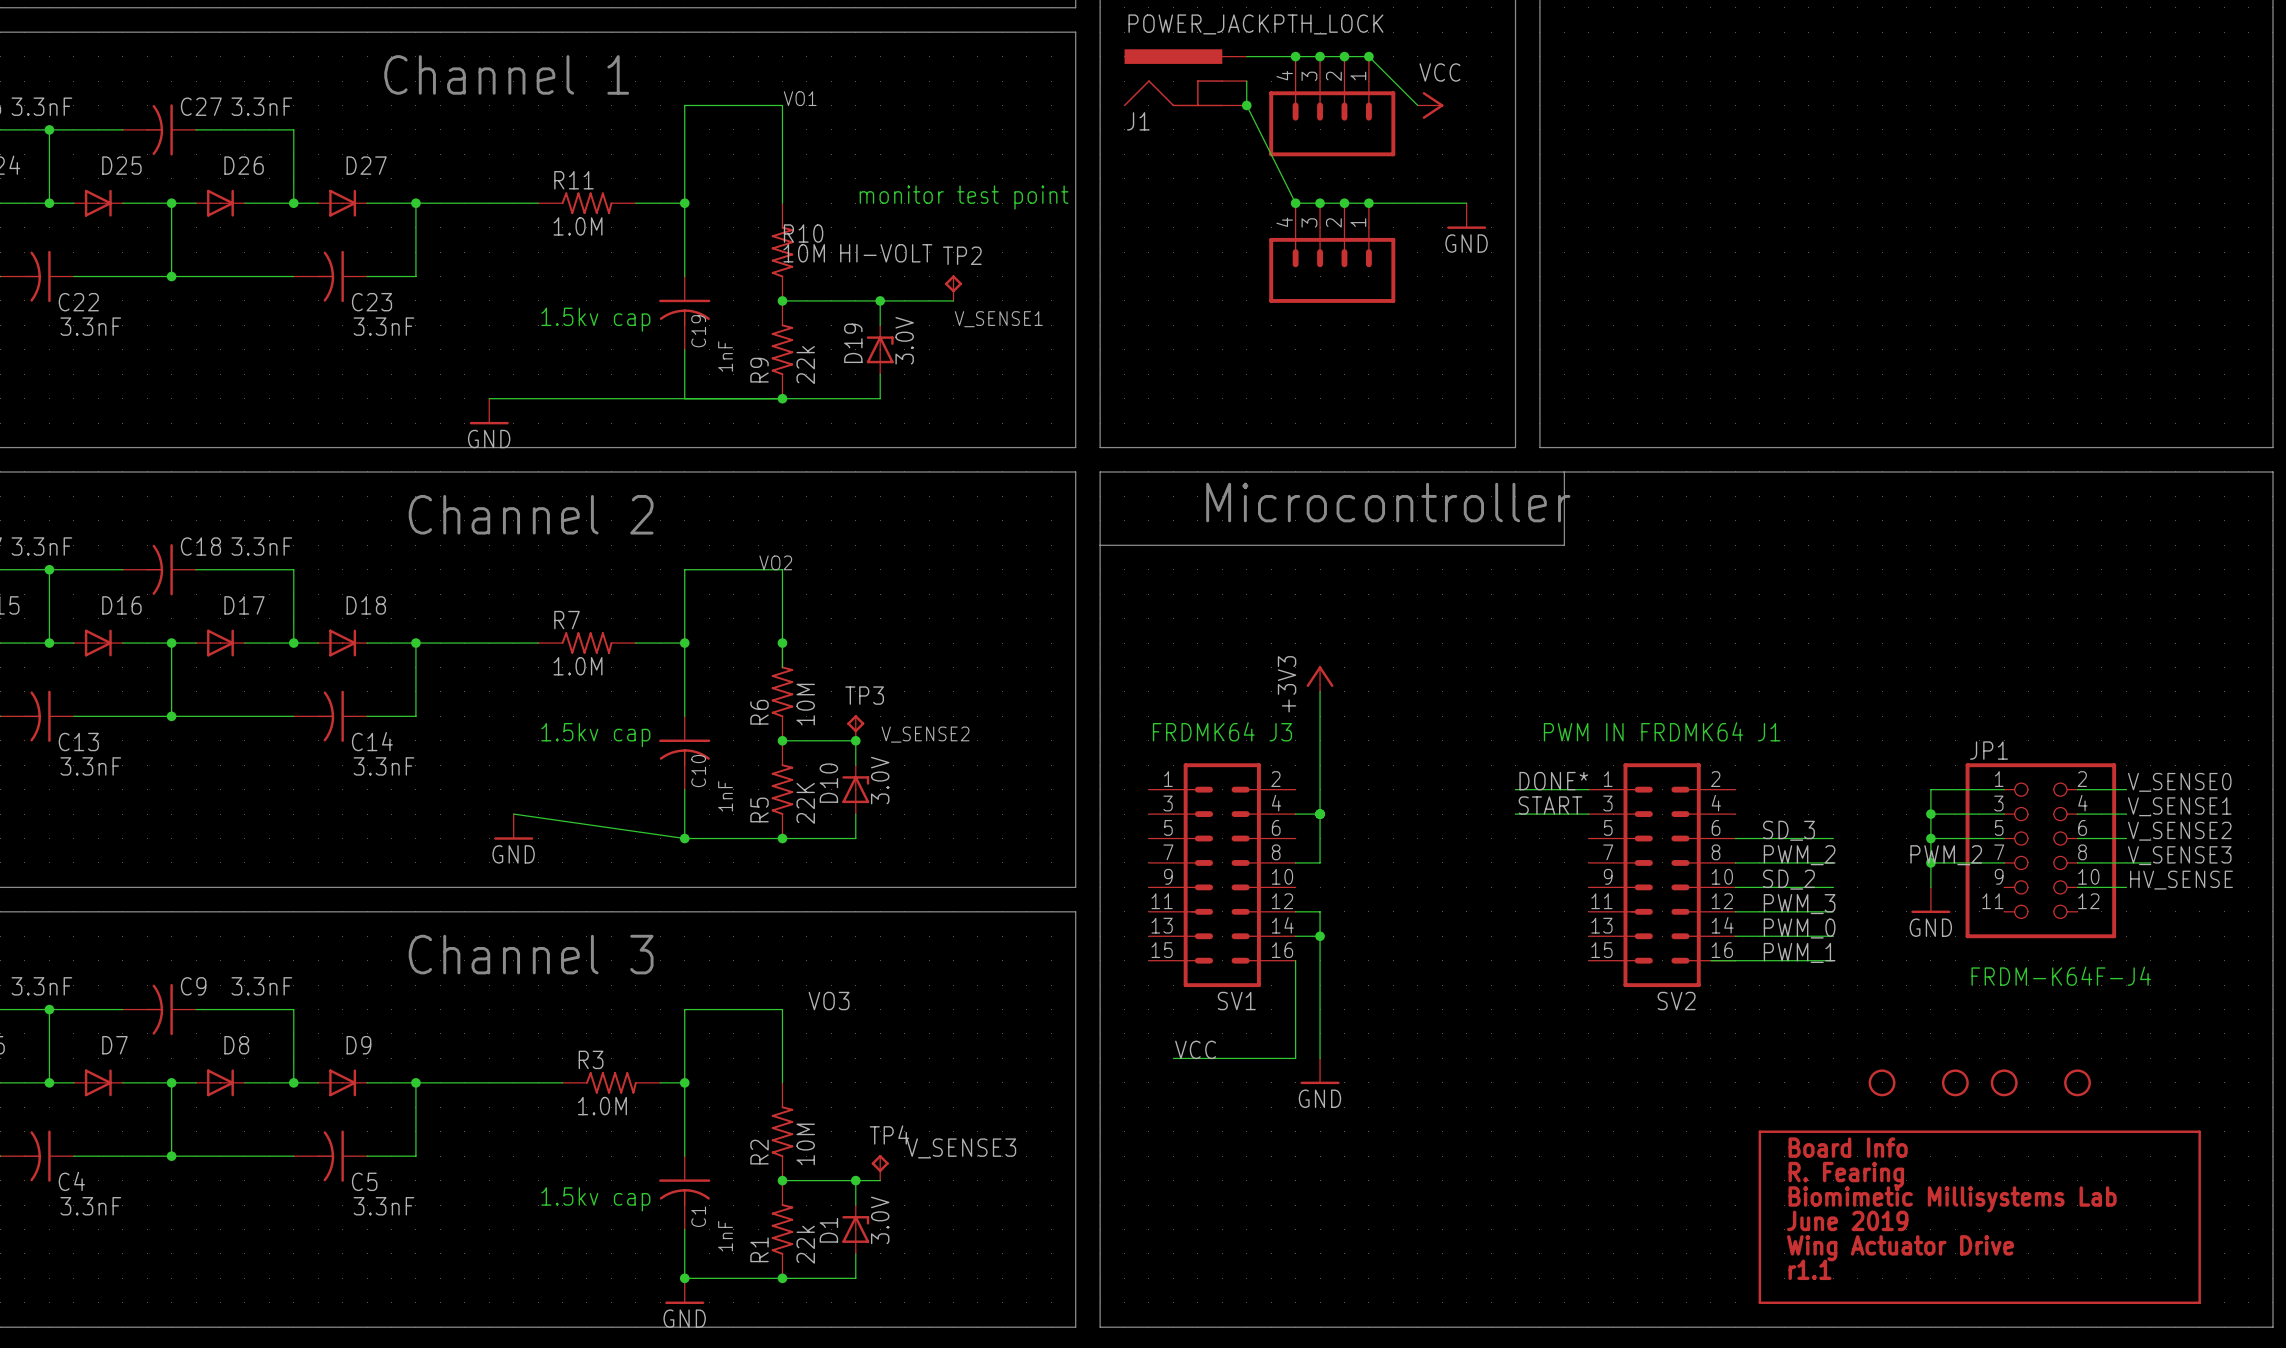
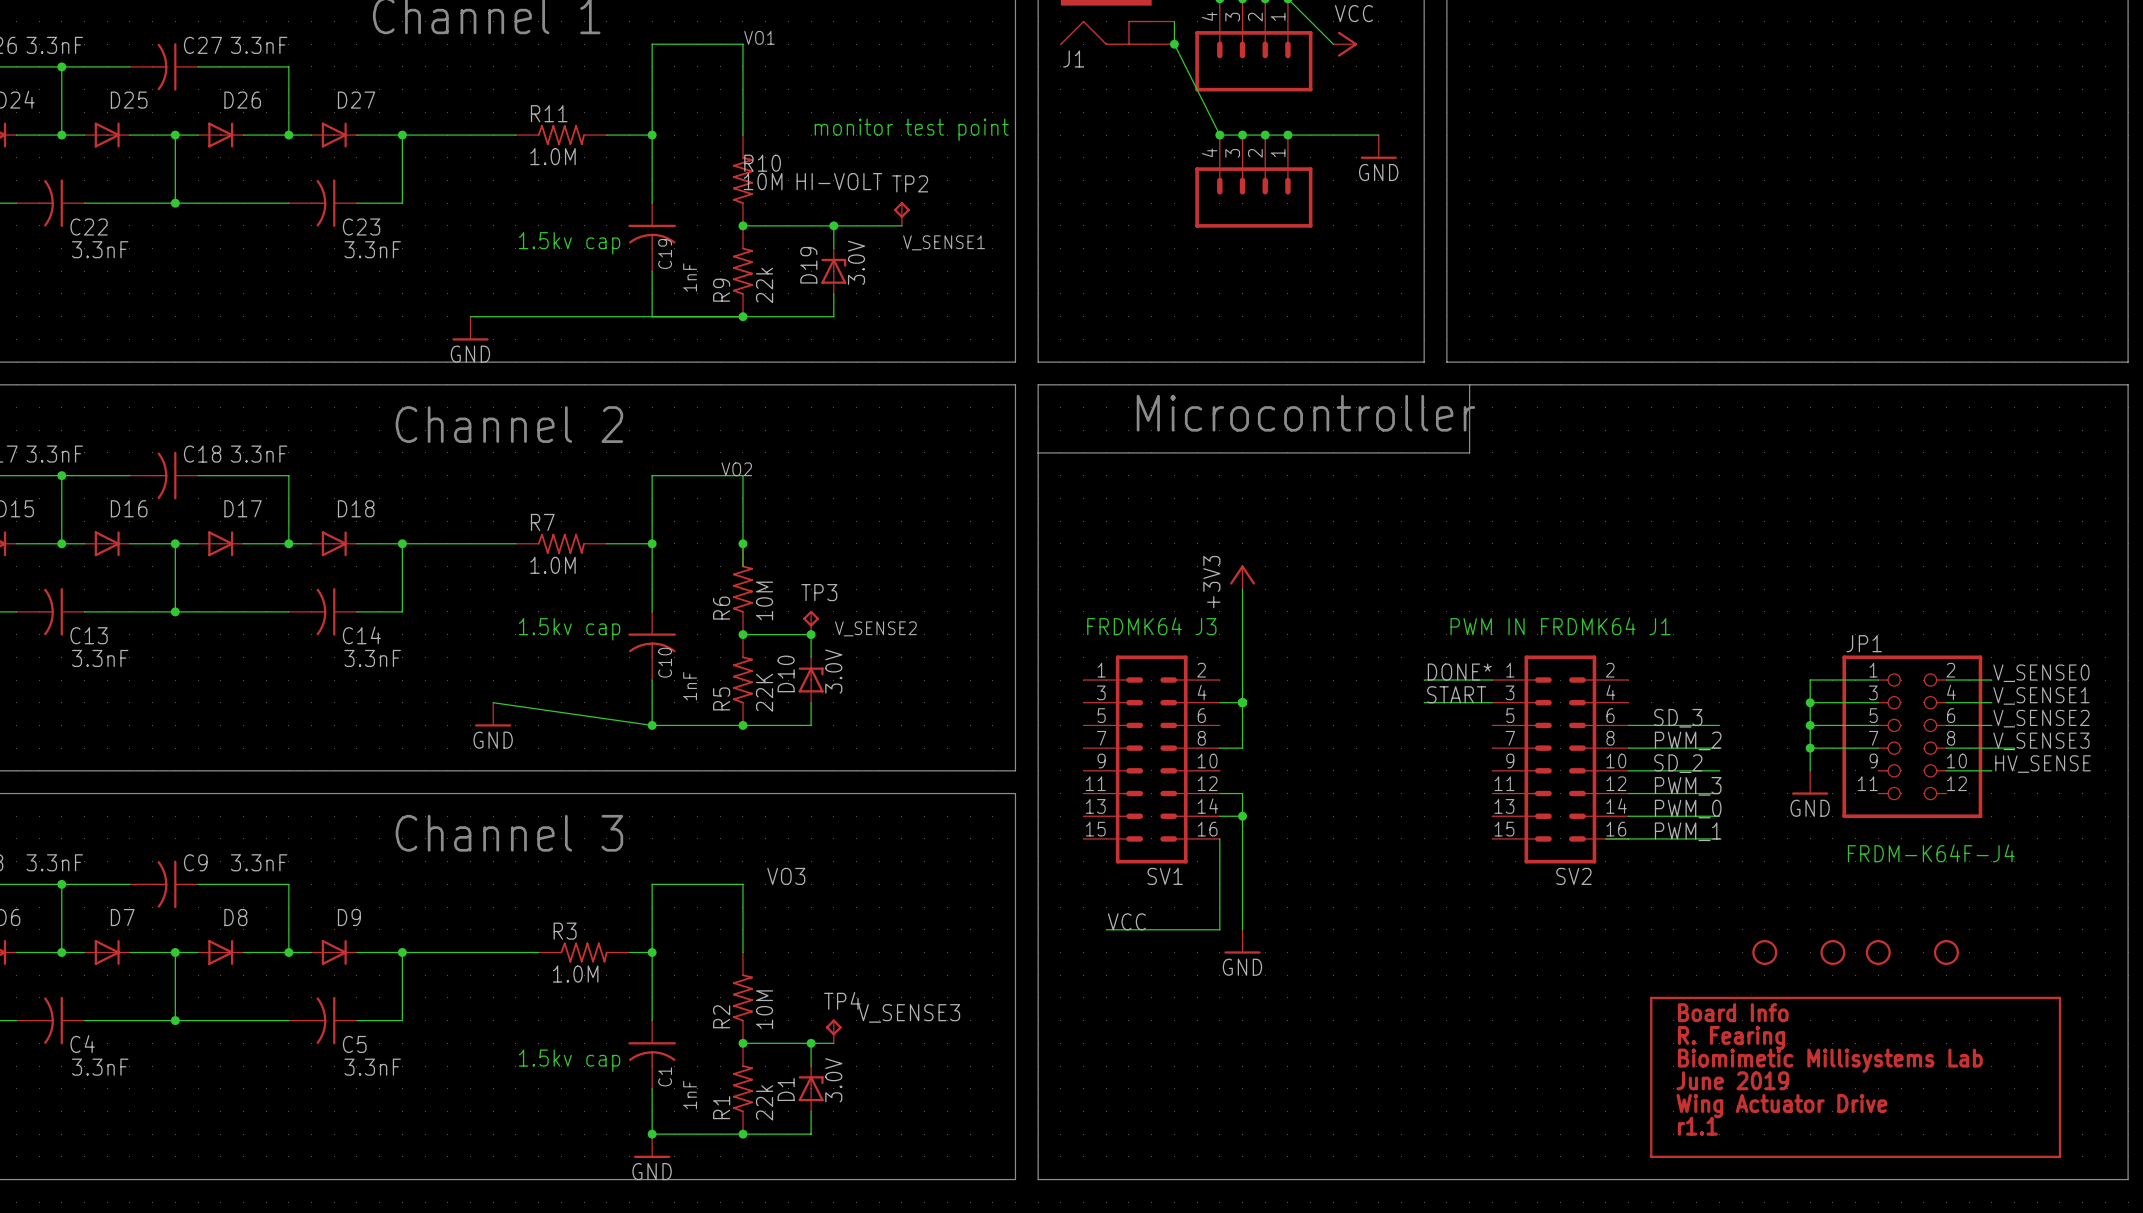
label: PWM_2 (1946, 855) -> none

